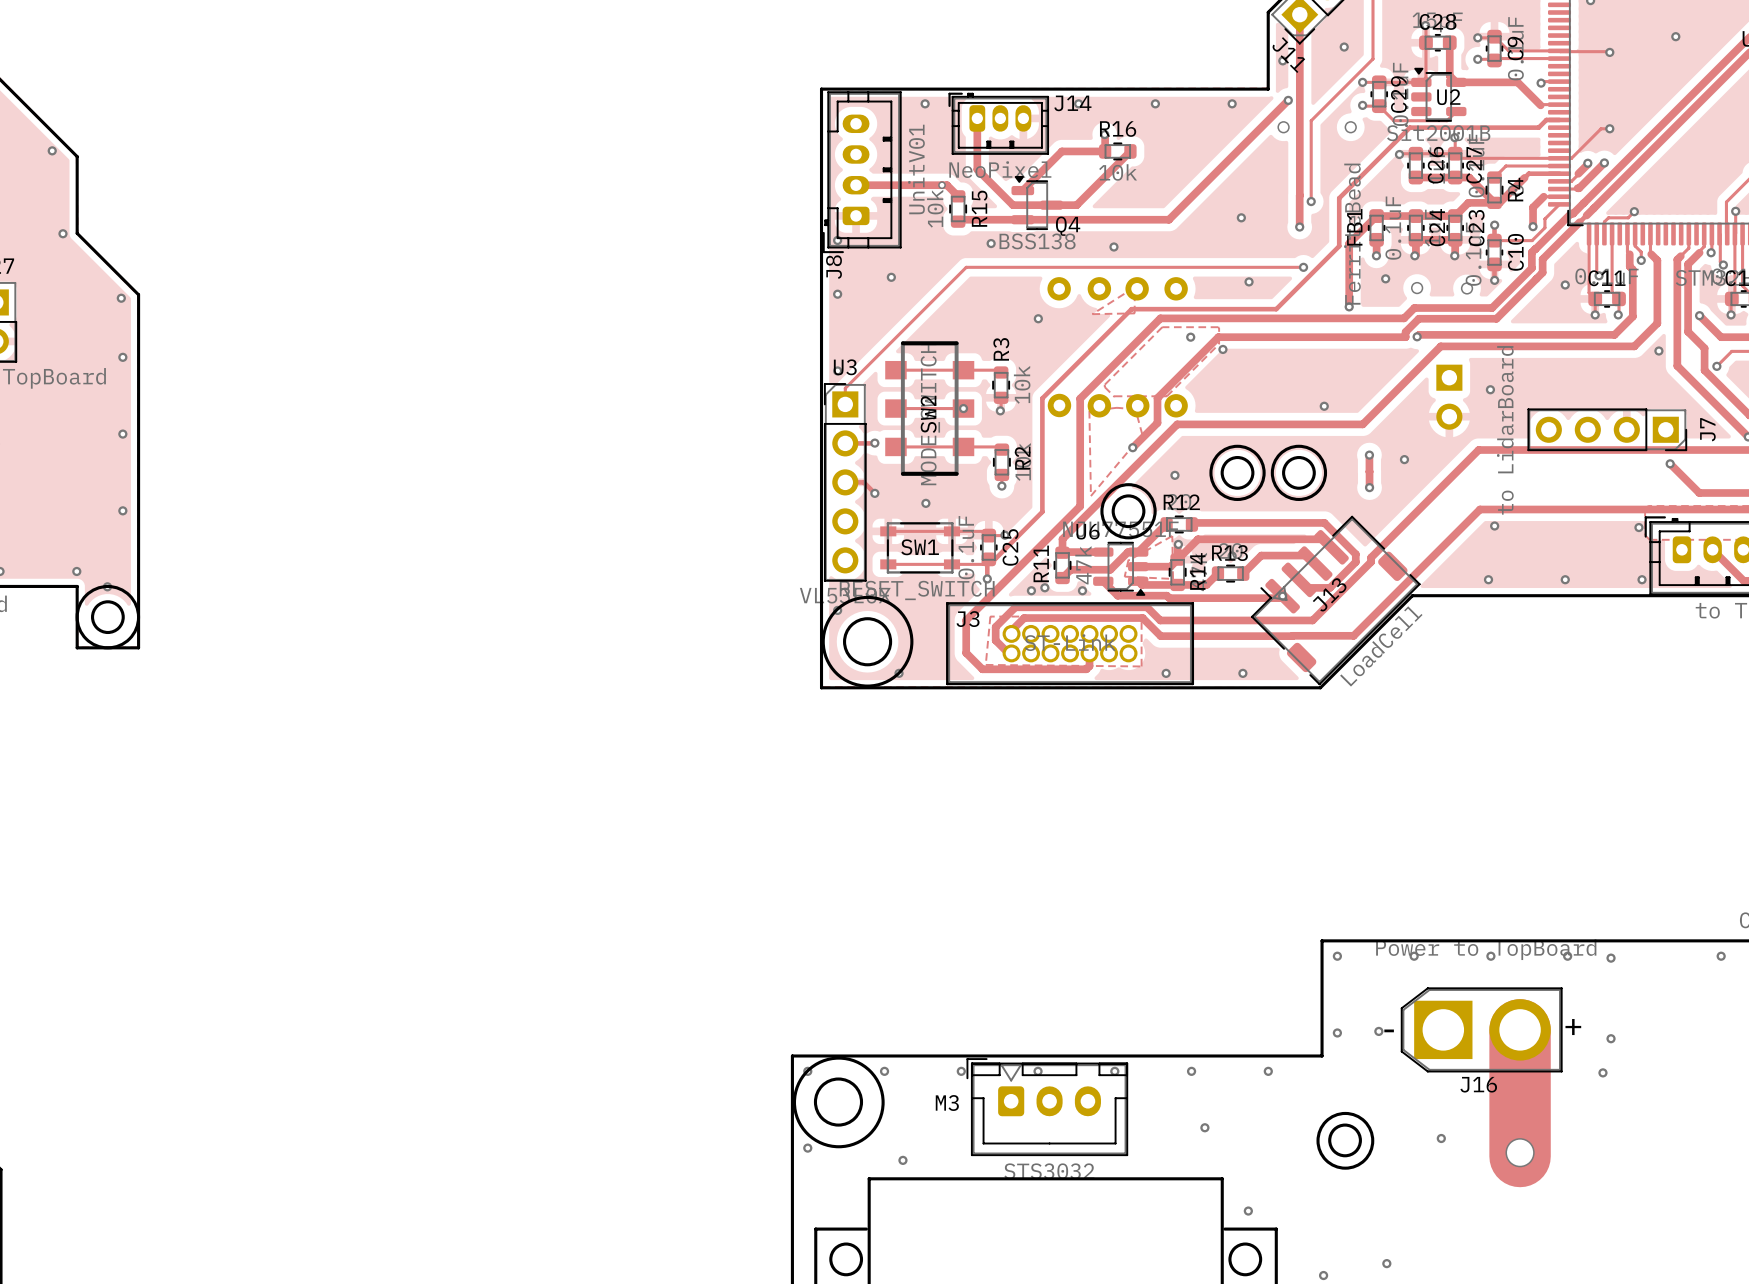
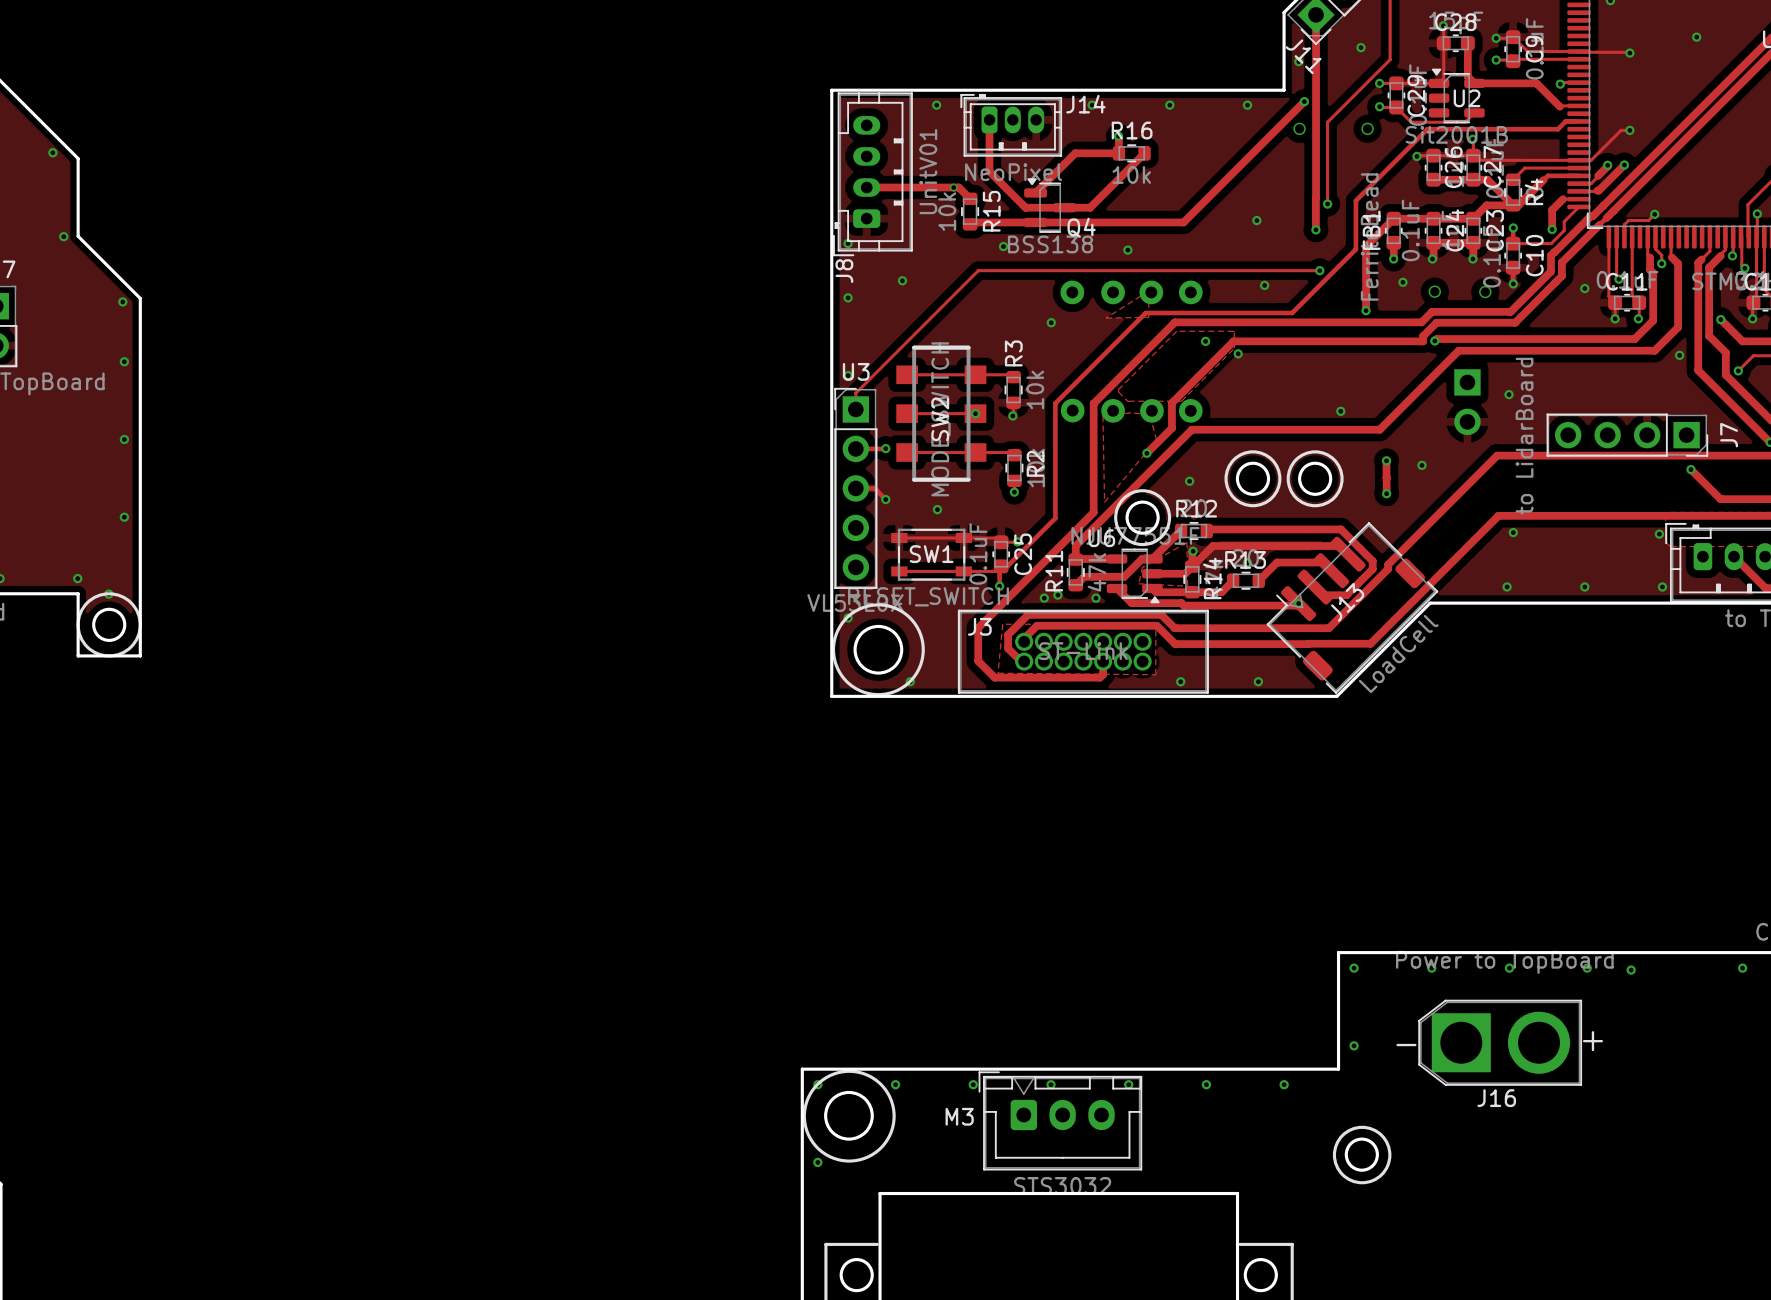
track: (1520, 1029) (1520, 1156) -> none
via: (1378, 1031) -> none
via: (1611, 1038) -> none
via: (1602, 1072) -> none
via: (1204, 1127) -> none
via: (1441, 1138) -> none
via: (1520, 1152) -> none
via: (902, 1160) -> none
via: (1248, 1211) -> none
via: (1386, 1263) -> none
via: (1323, 1275) -> none

